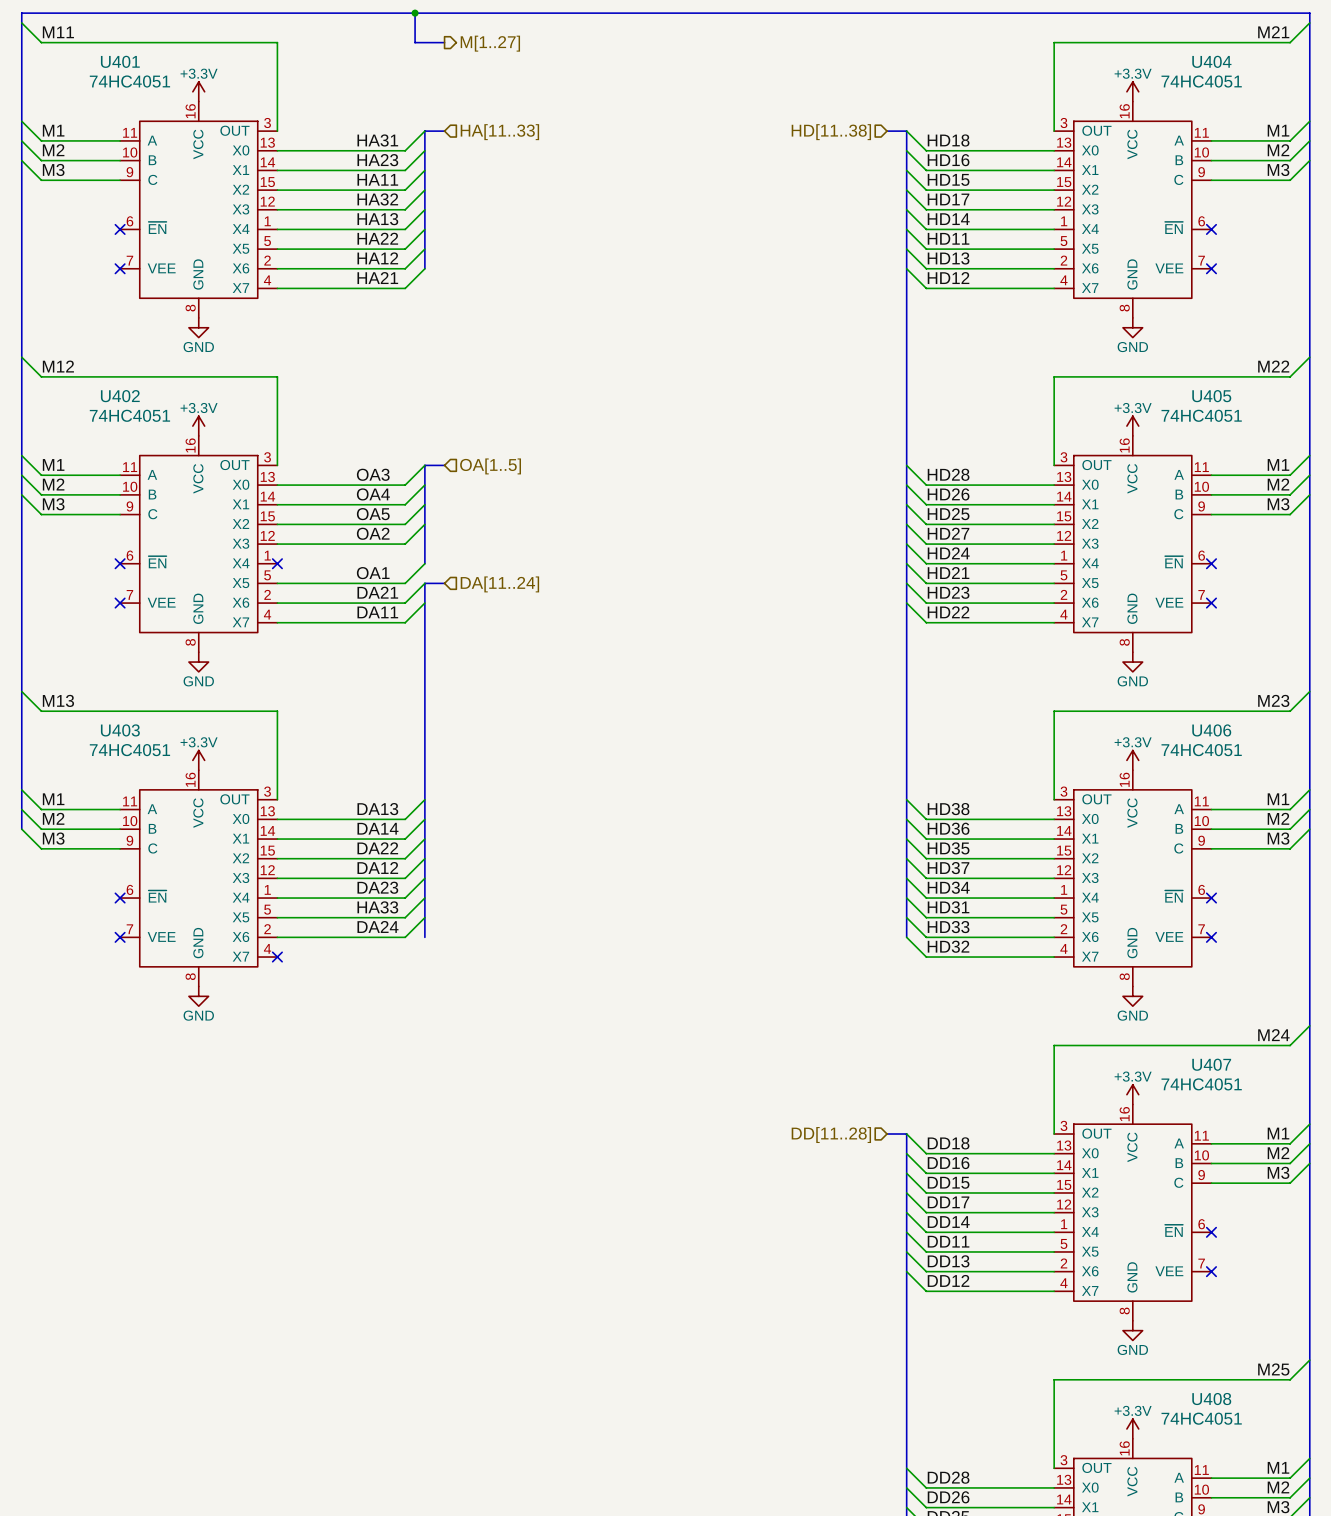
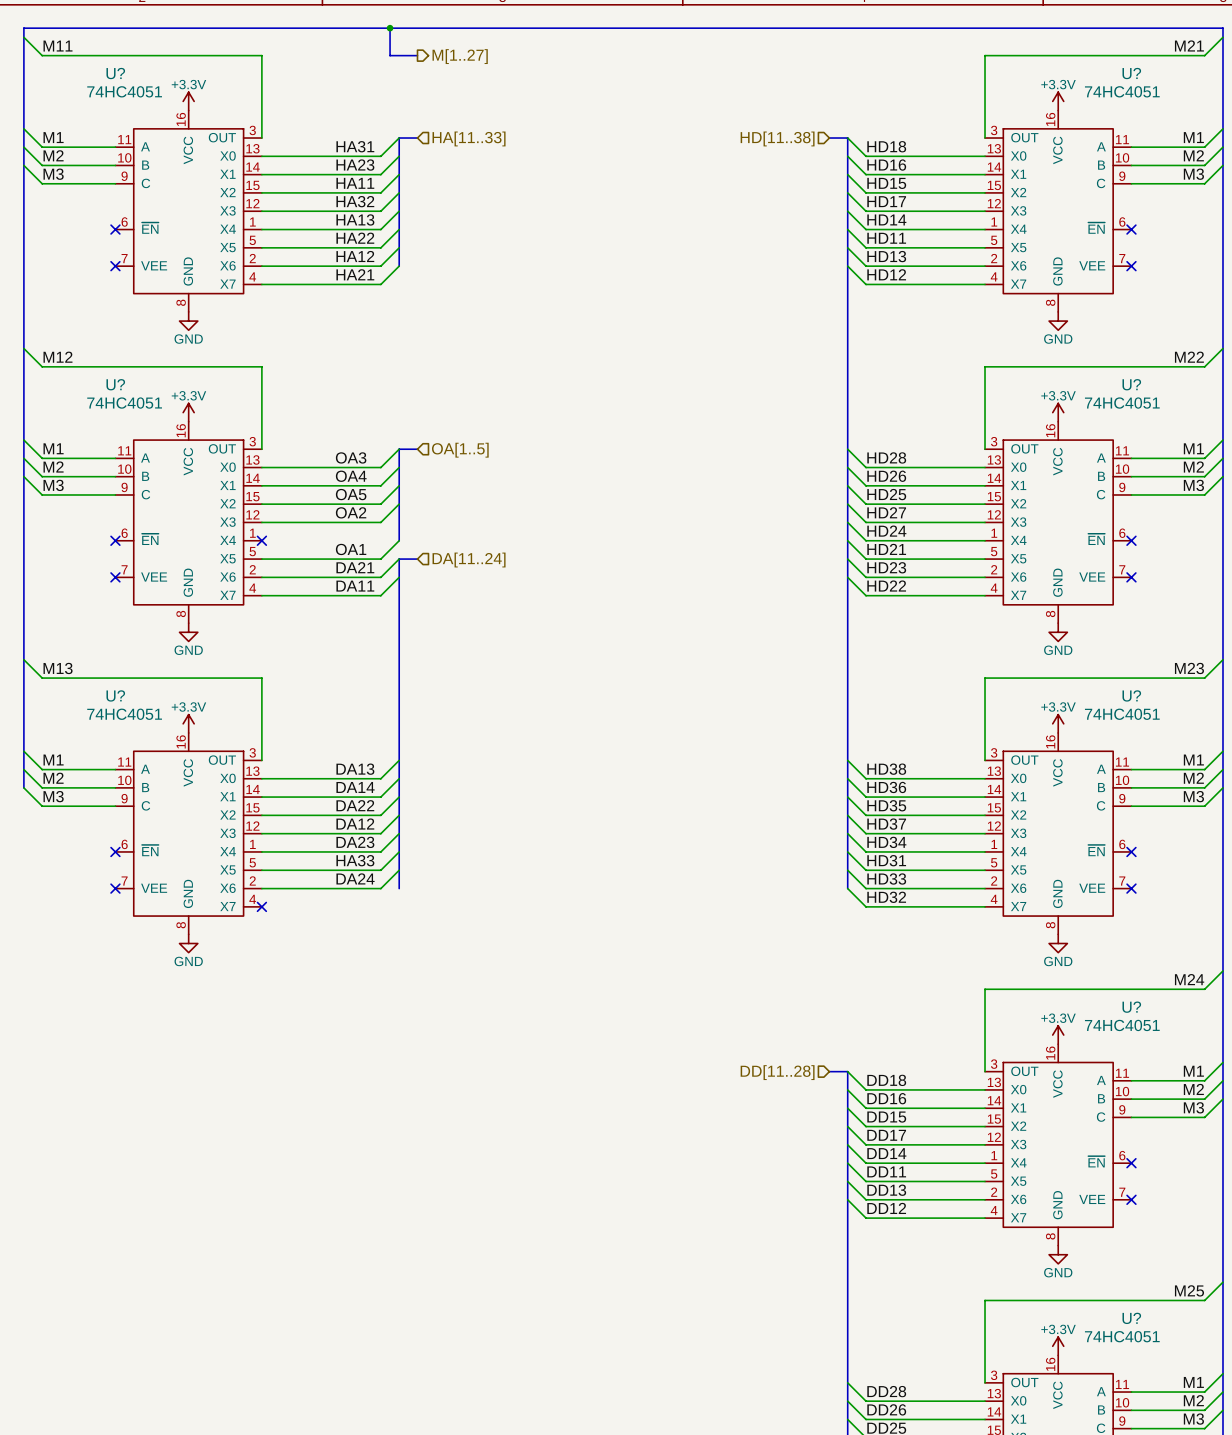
U401 name: U401 (120, 61) -> U? (115, 73)
U404 name: U404 (1211, 61) -> U? (1131, 73)
U402 name: U402 (120, 396) -> U? (115, 384)
U405 name: U405 (1211, 396) -> U? (1131, 384)
U403 name: U403 (120, 730) -> U? (115, 695)
U406 name: U406 (1211, 730) -> U? (1131, 695)
U407 name: U407 (1211, 1064) -> U? (1131, 1007)
U408 name: U408 (1211, 1399) -> U? (1131, 1318)

